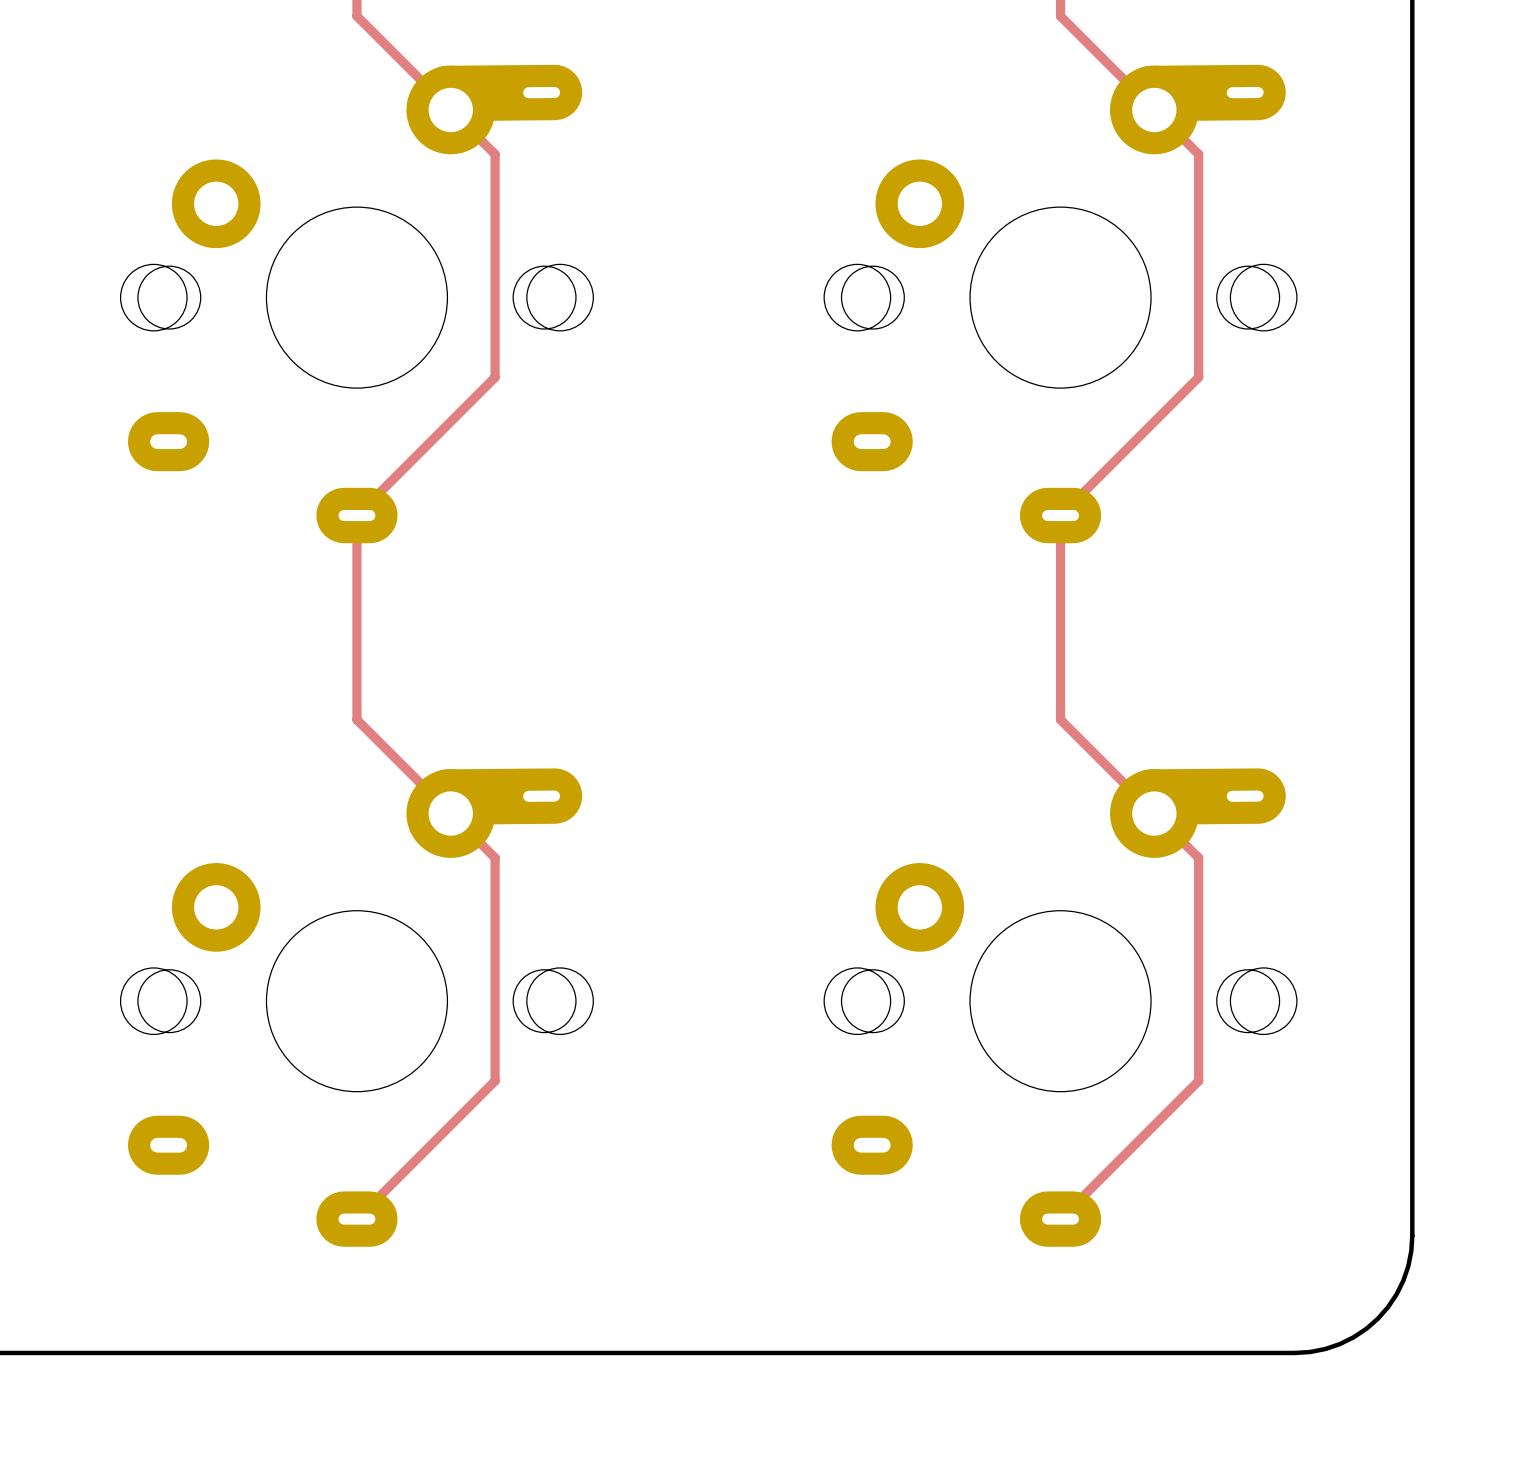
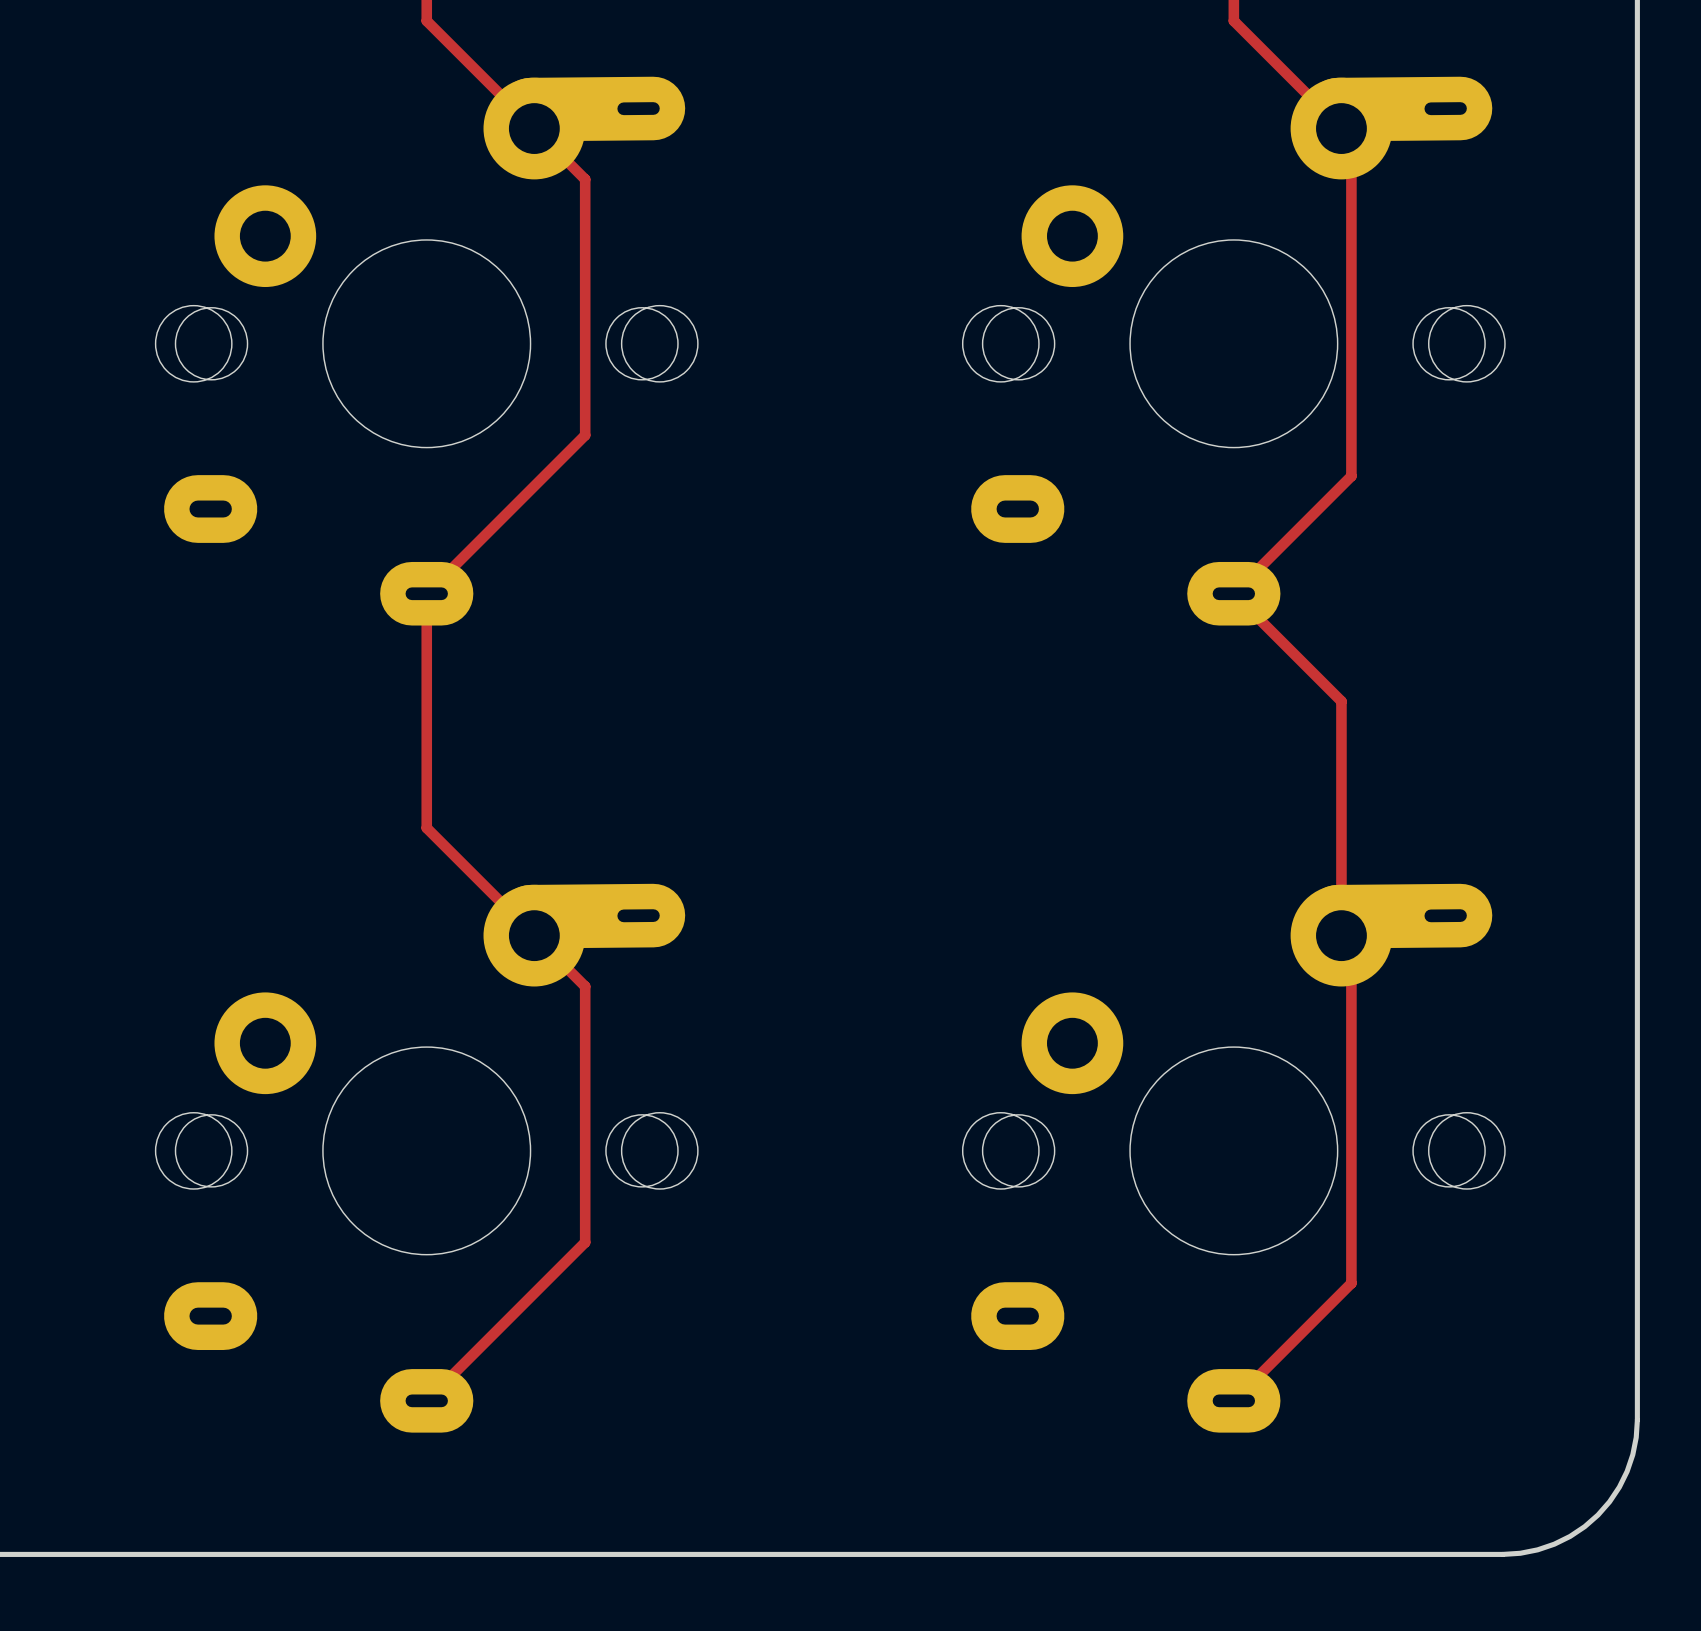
track: (1163, 118) (1198, 154) (1198, 377) (1163, 413) -> (1351, 138) (1351, 476)
track: (1060, 515) (1060, 719) (1154, 813) -> (1233, 593) (1341, 701) (1341, 935)
track: (1163, 822) (1198, 857) (1198, 1080) (1163, 1116) -> (1351, 945) (1351, 1283)

